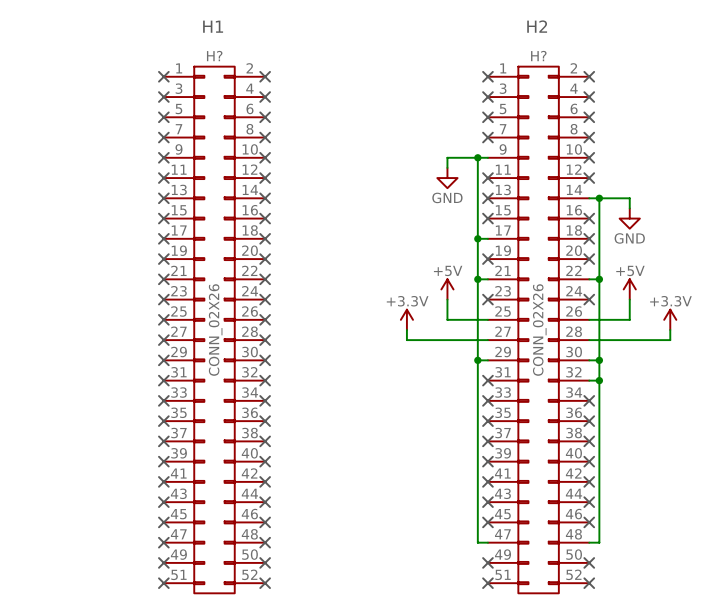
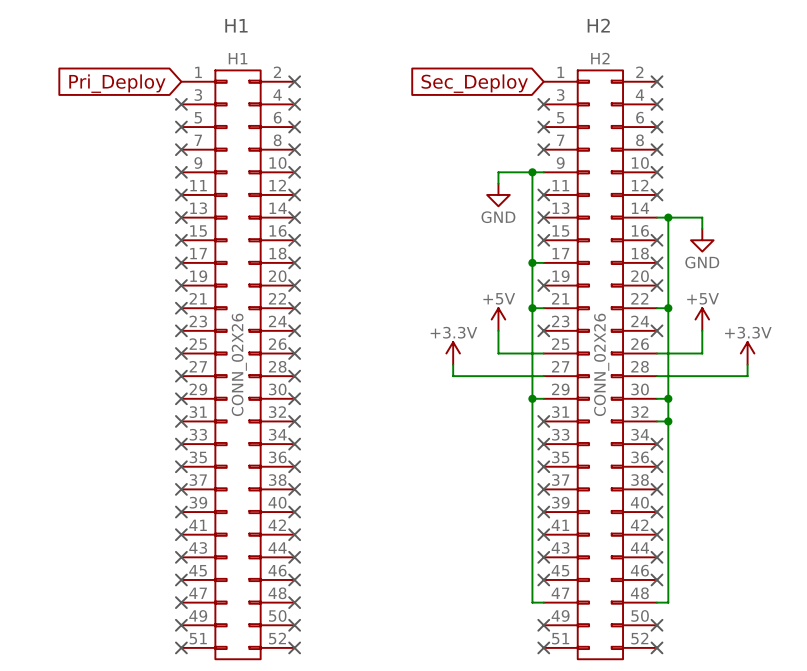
H? name: H? (214, 56) -> H1 (238, 58)
H? name: H? (538, 56) -> H2 (600, 58)
no-connect mark: (163, 76) -> none
no-connect mark: (487, 76) -> none
global label: none -> Pri_Deploy (117, 83)
global label: none -> Sec_Deploy (474, 83)

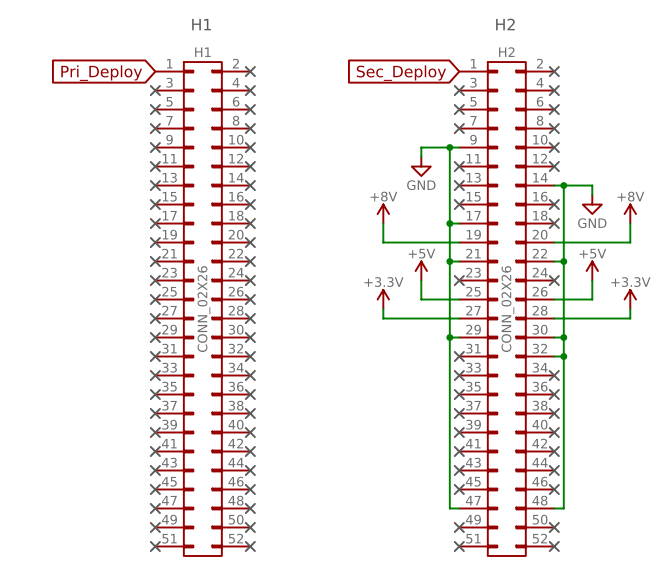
power symbol: none -> +8V (383, 214)
power symbol: none -> +8V (630, 214)
wire: none -> (383, 223) (383, 242) (459, 242)
wire: none -> (630, 223) (630, 242) (554, 242)
no-connect mark: (543, 285) -> none
no-connect mark: (657, 285) -> none

